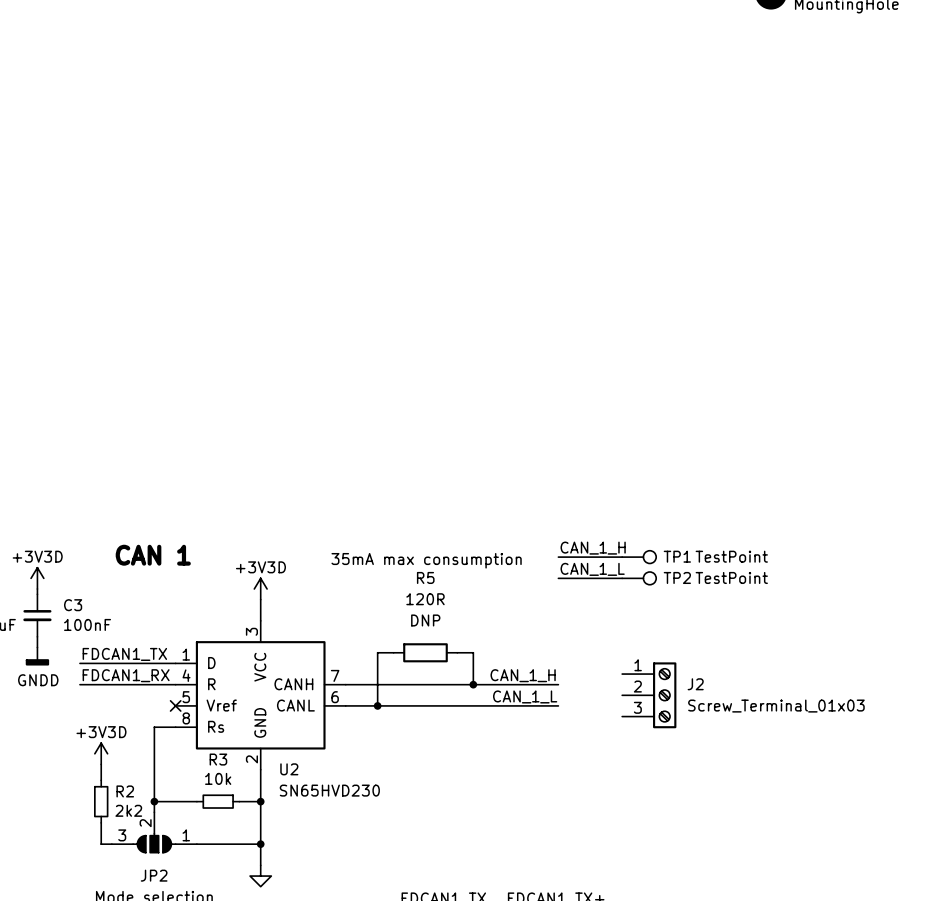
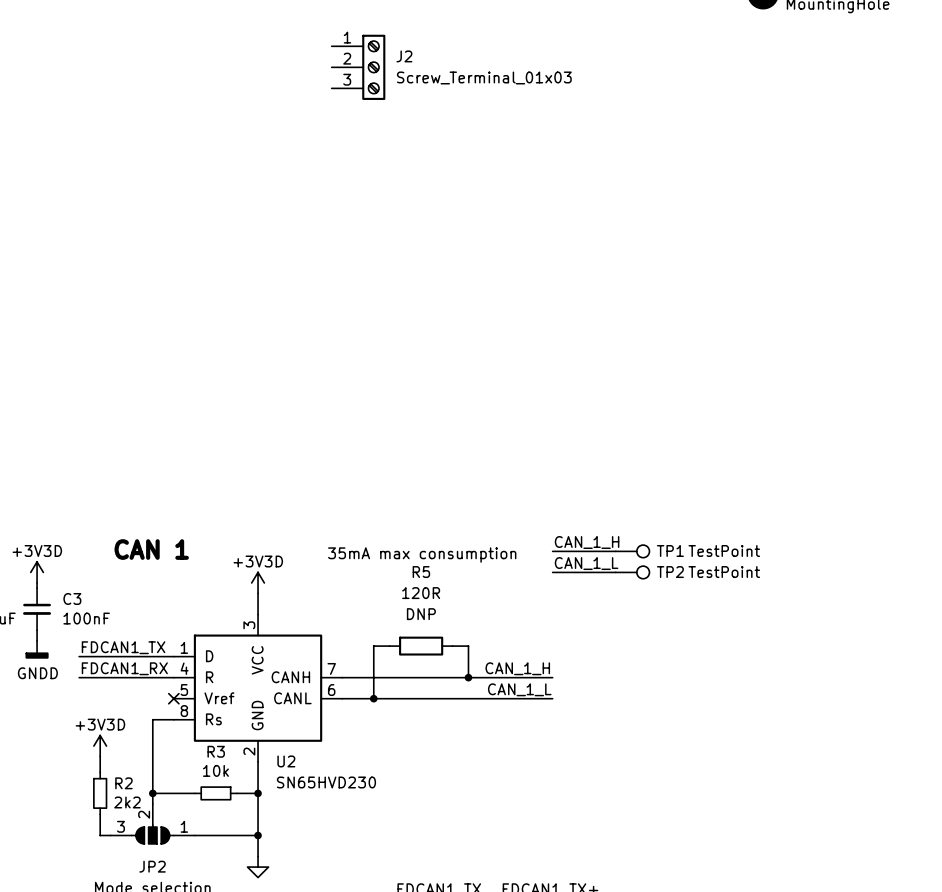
J2 position: (649, 695) -> (358, 67)

